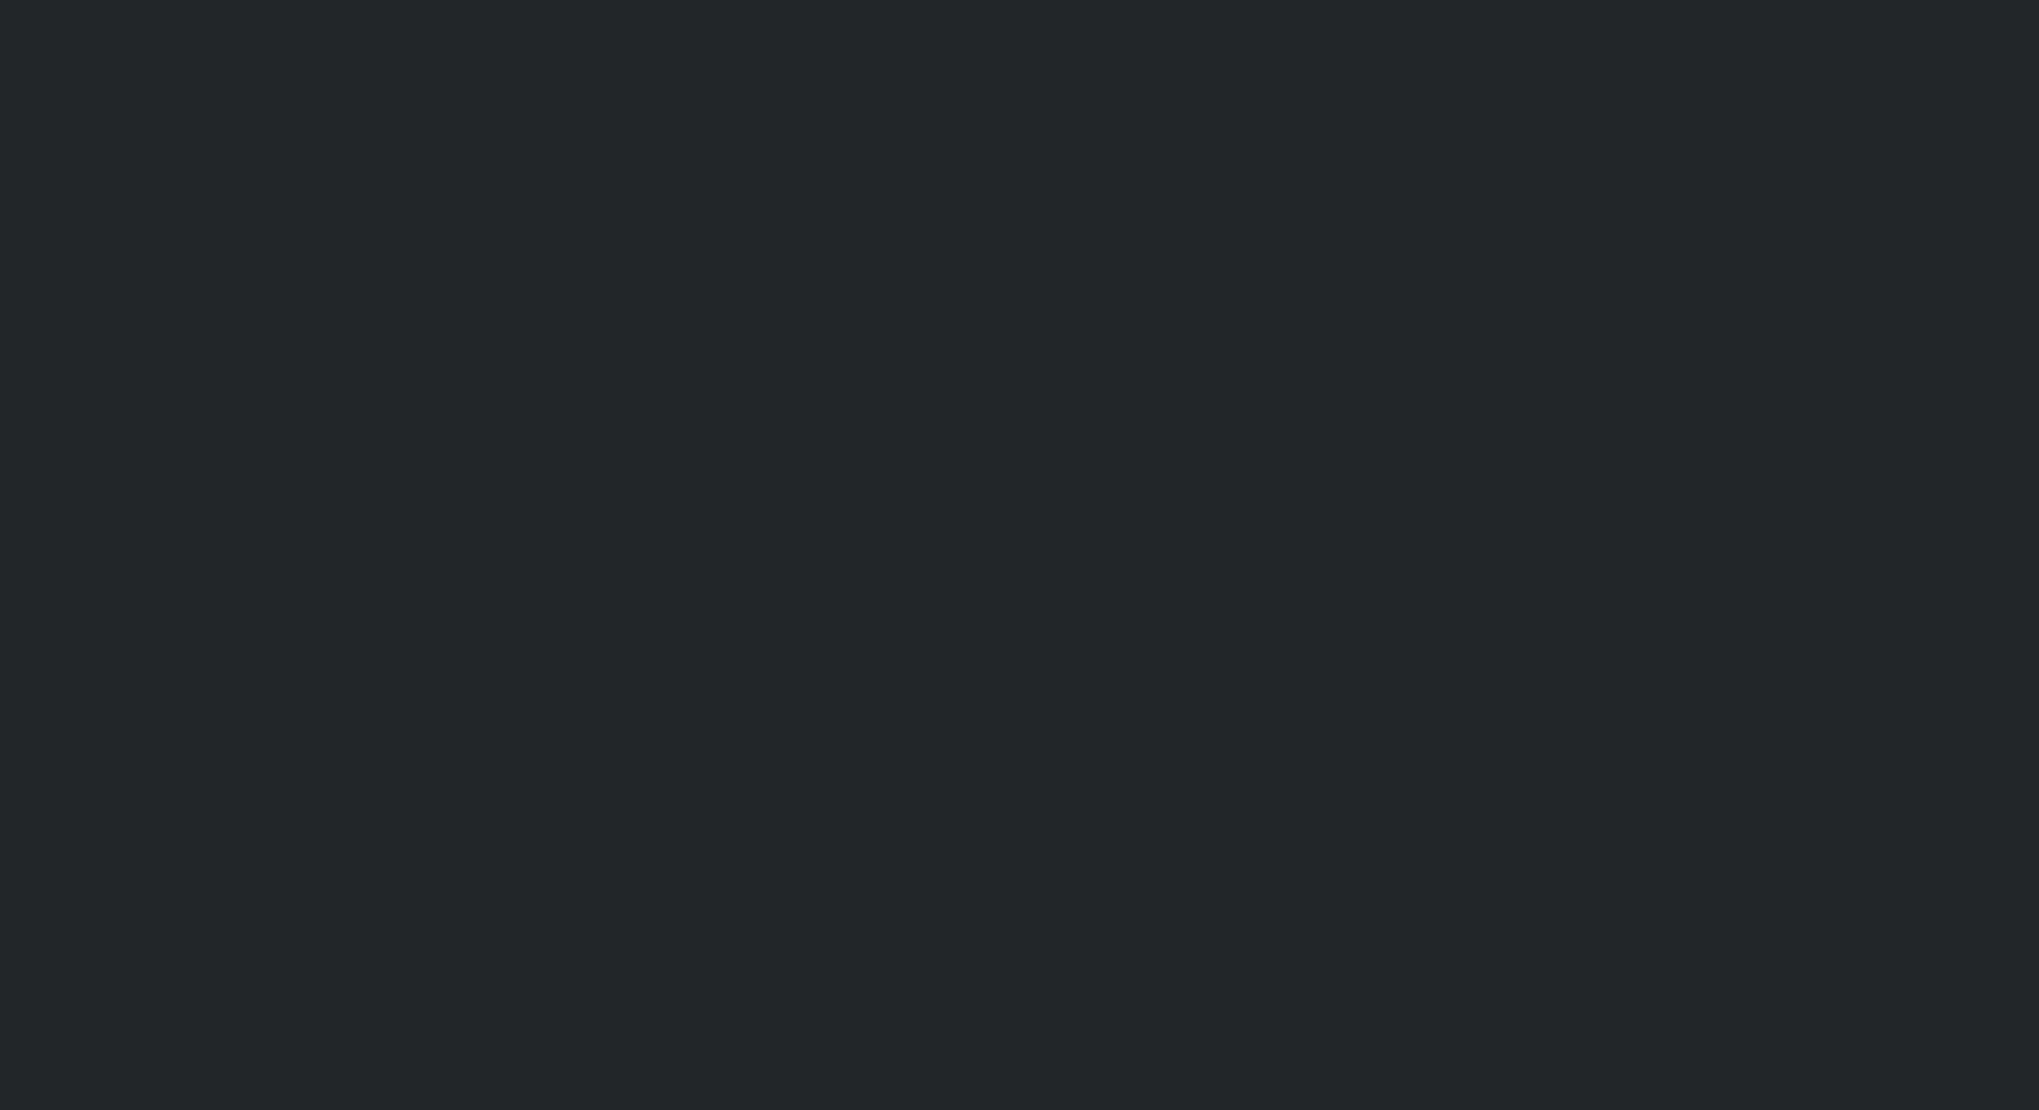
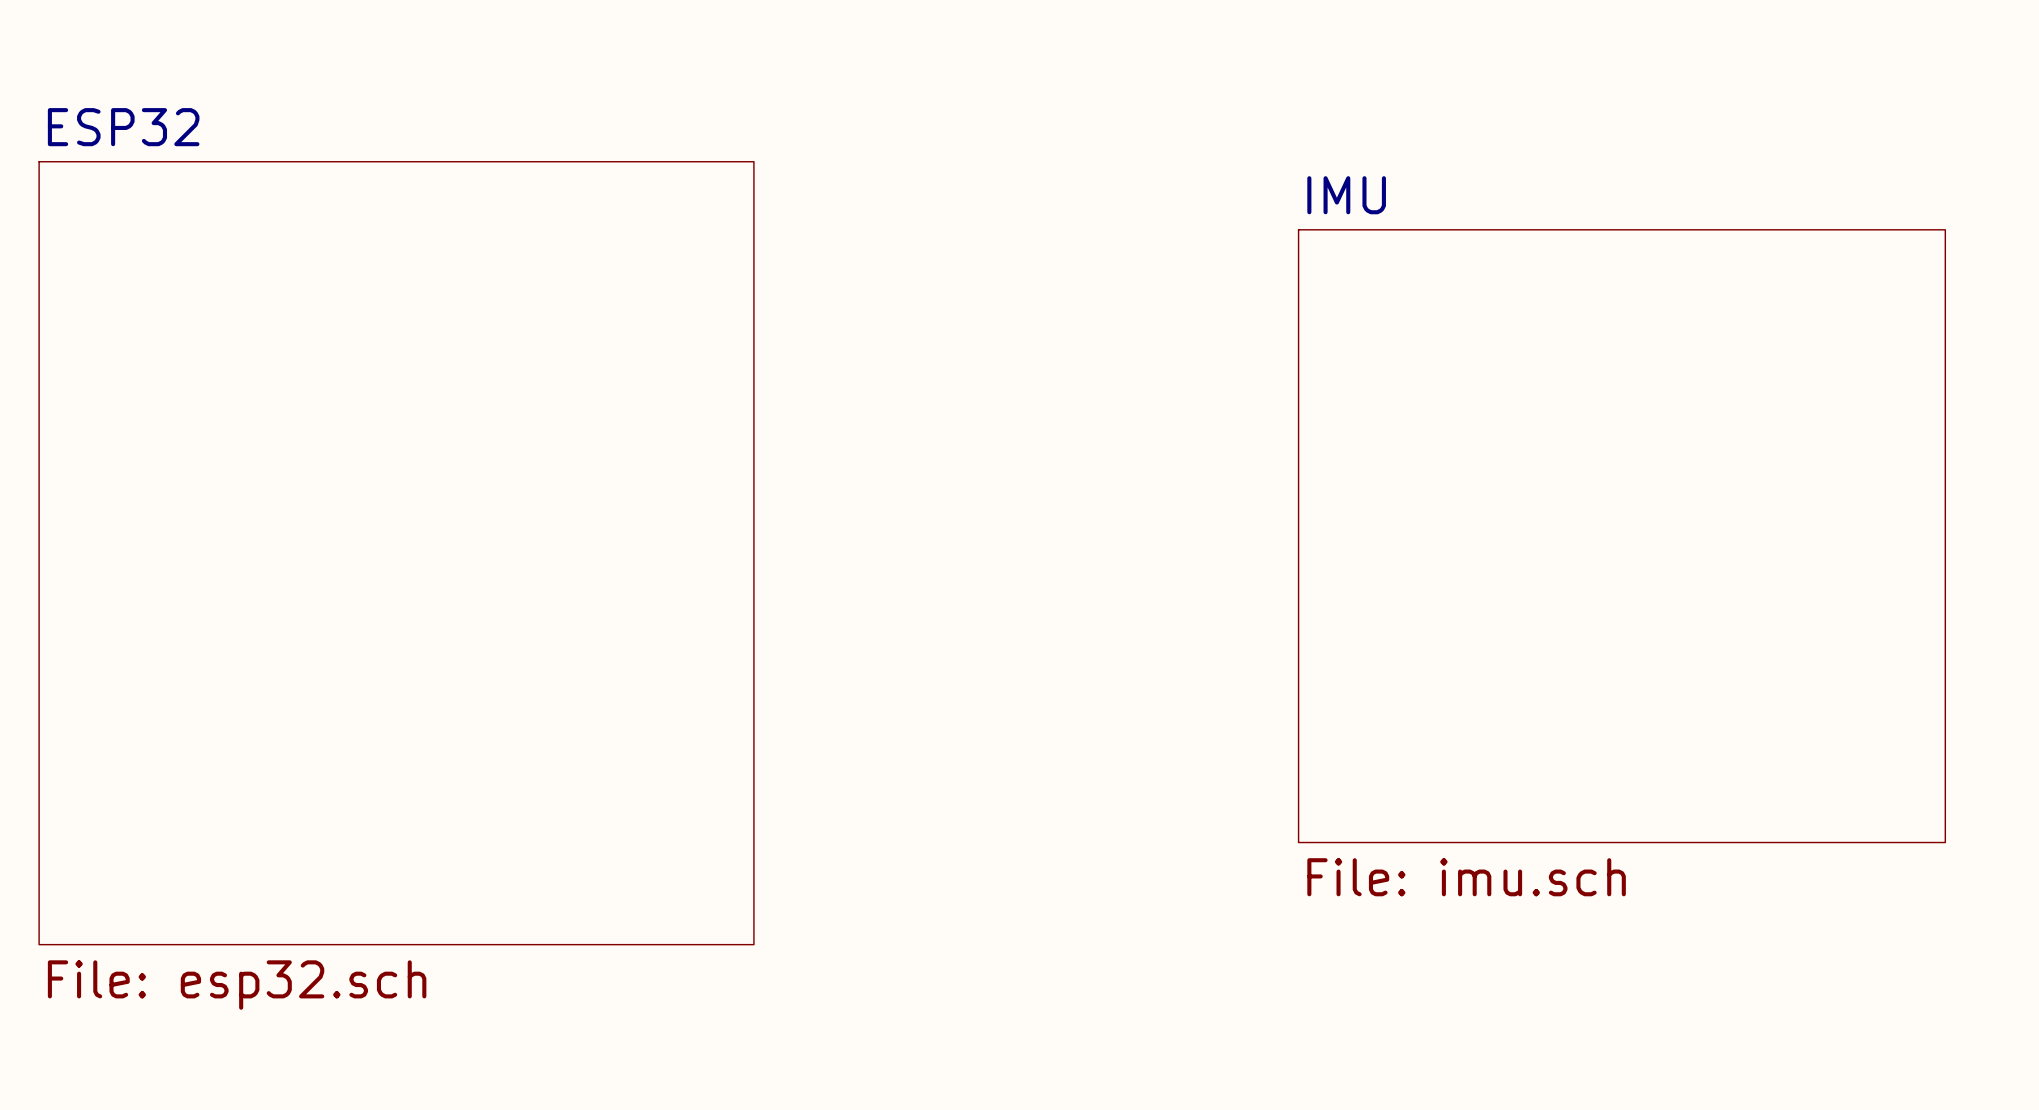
sheet IMU: none -> File: imu.sch (1621, 536)
sheet ESP32: none -> File: esp32.sch (396, 553)

